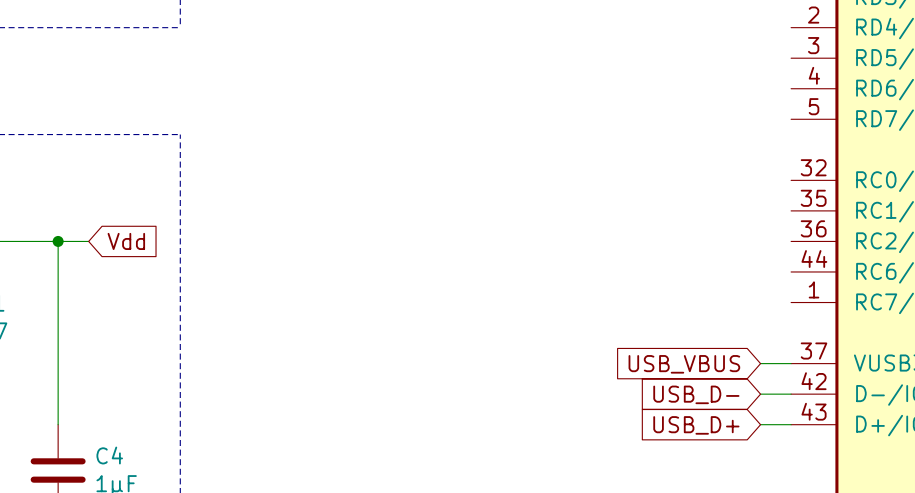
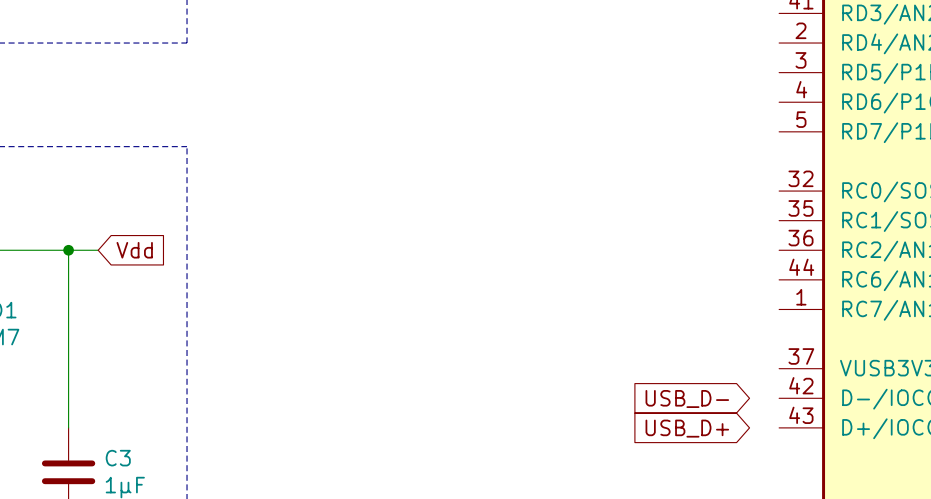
wire: (760, 363) (791, 363) -> none
global label: USB_VBUS (684, 364) -> none
wire: (760, 394) (791, 394) -> none
wire: (760, 424) (791, 424) -> none
C4 name: C4 (109, 455) -> C3 (118, 458)

